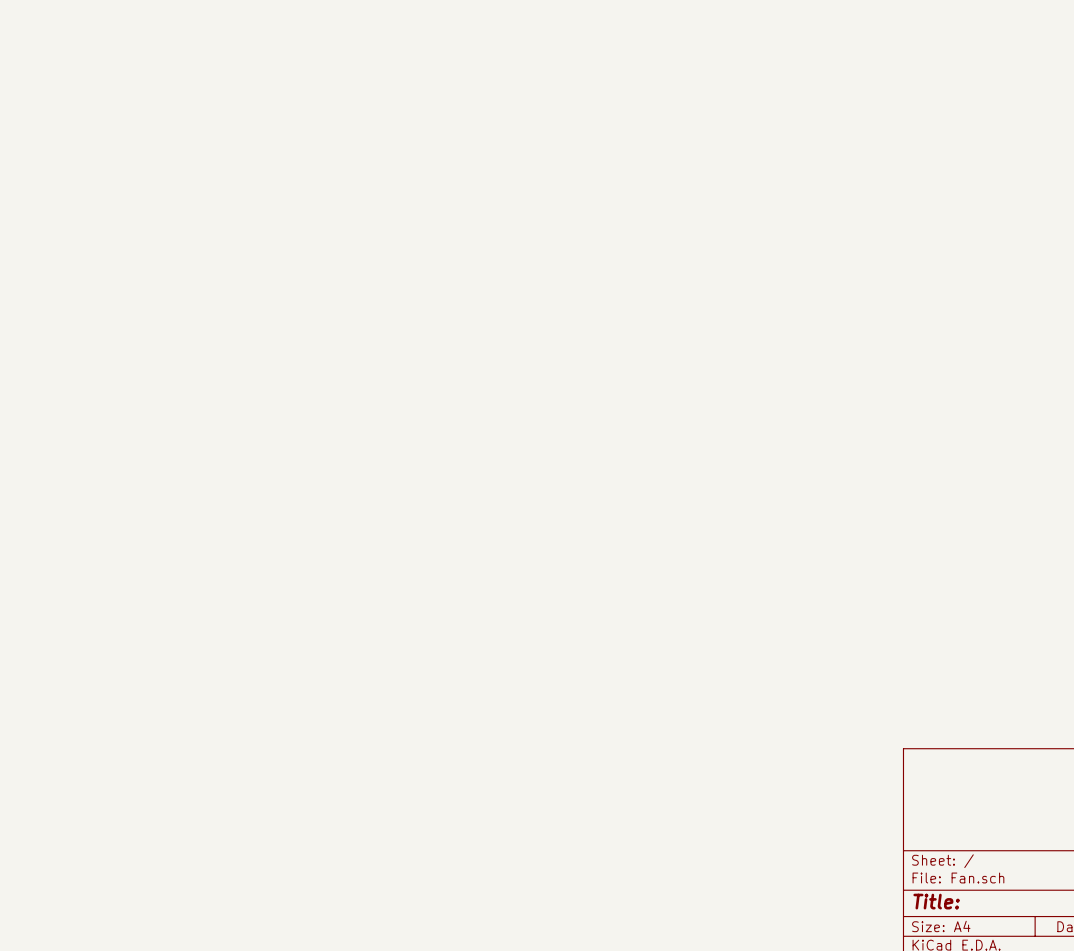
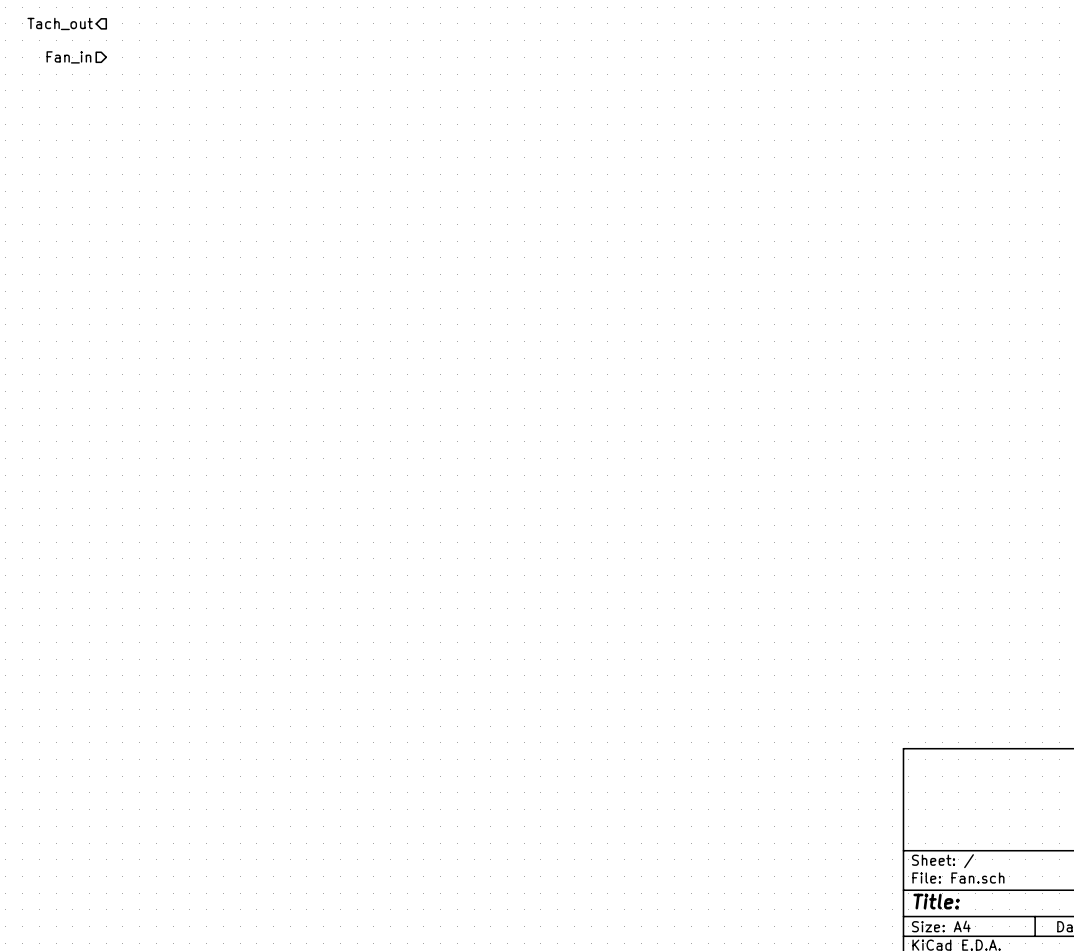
hierarchical label: none -> Tach_out (60, 23)
hierarchical label: none -> Fan_in (68, 57)

